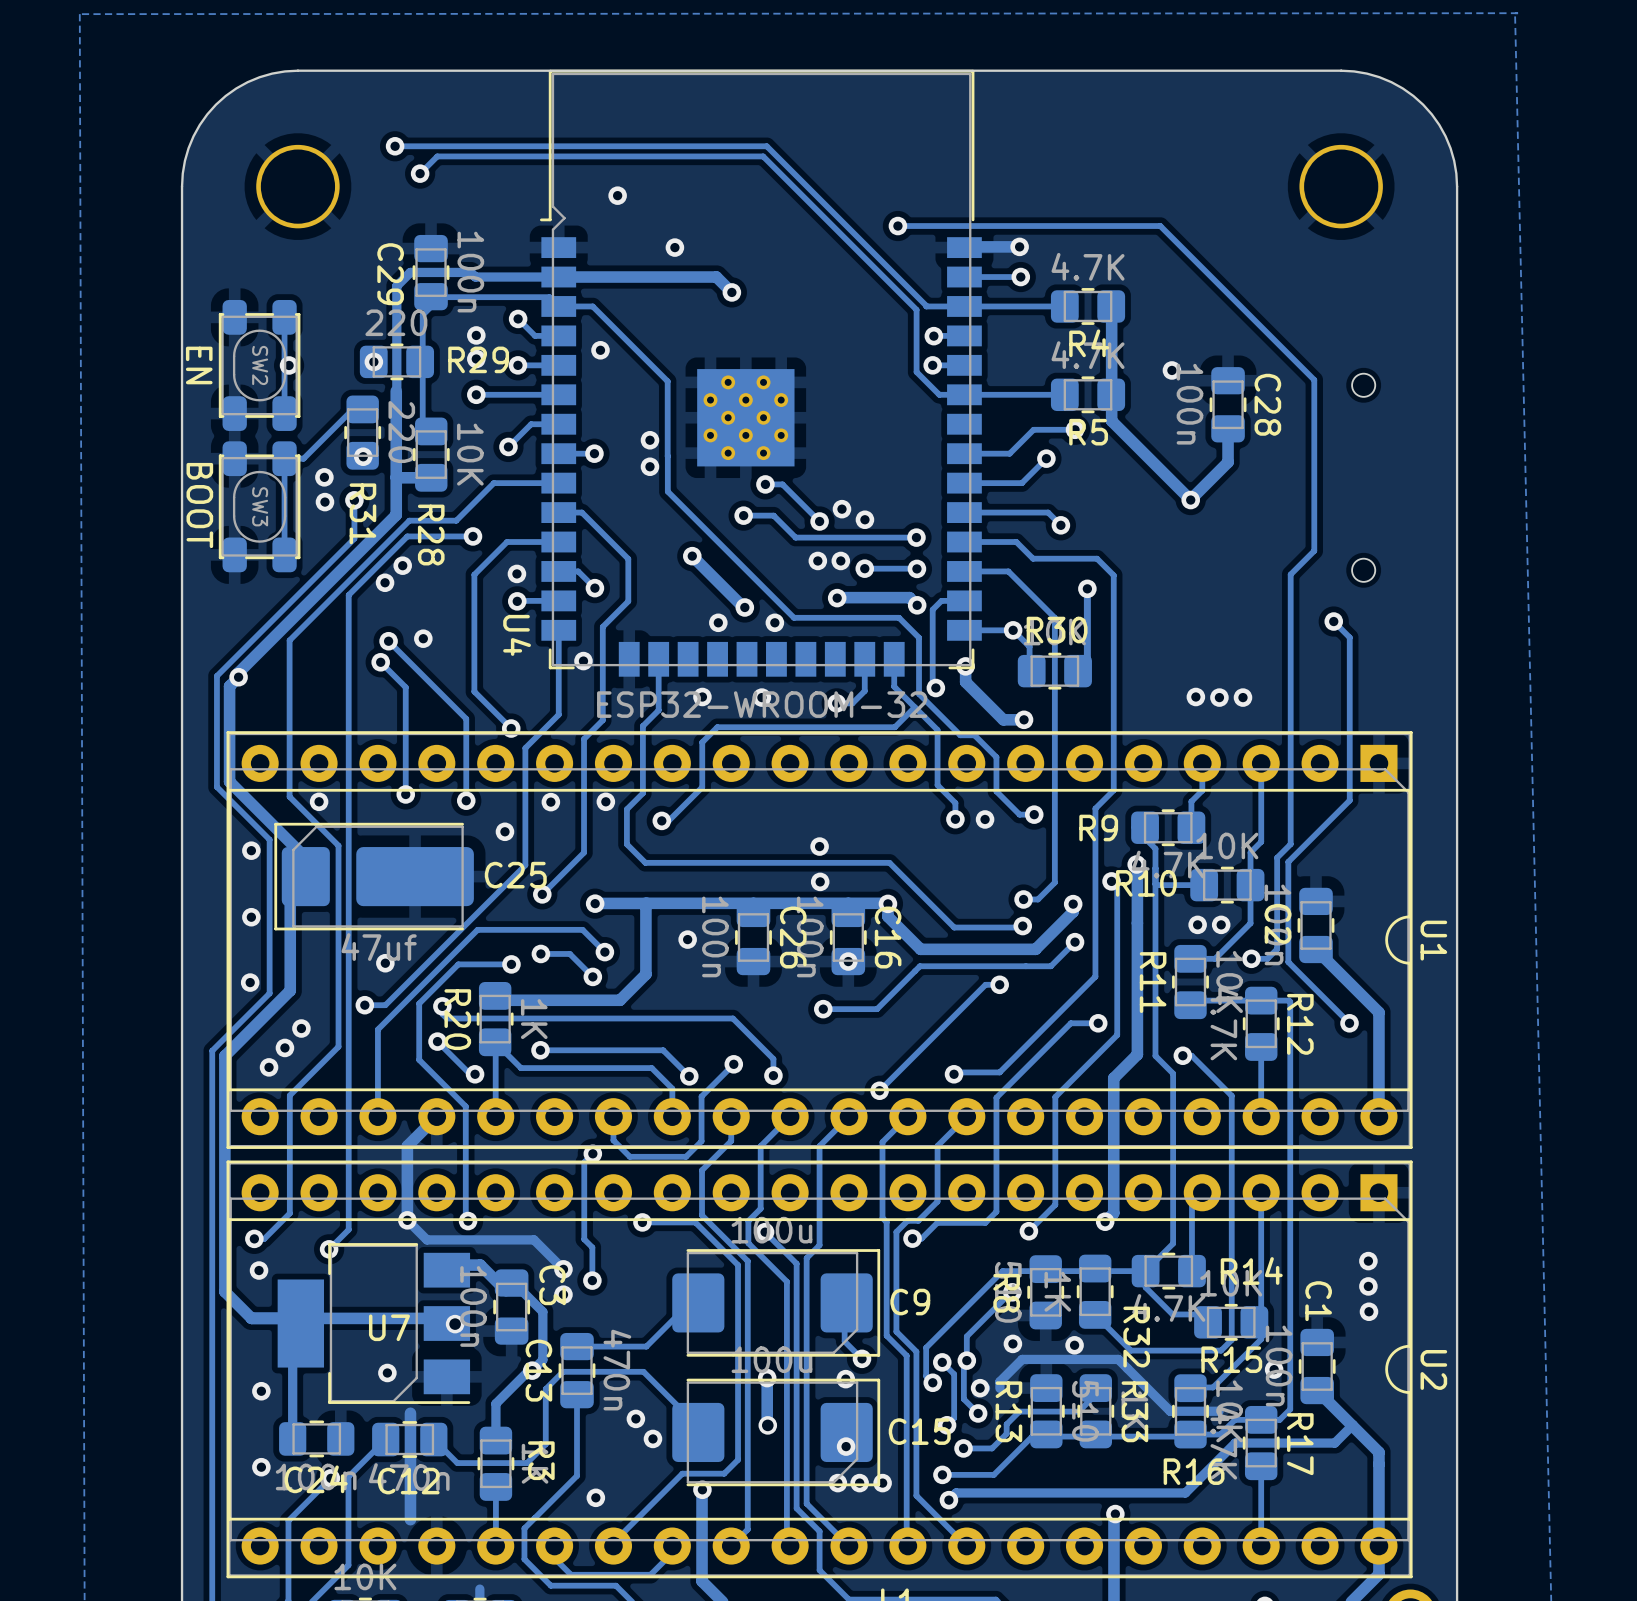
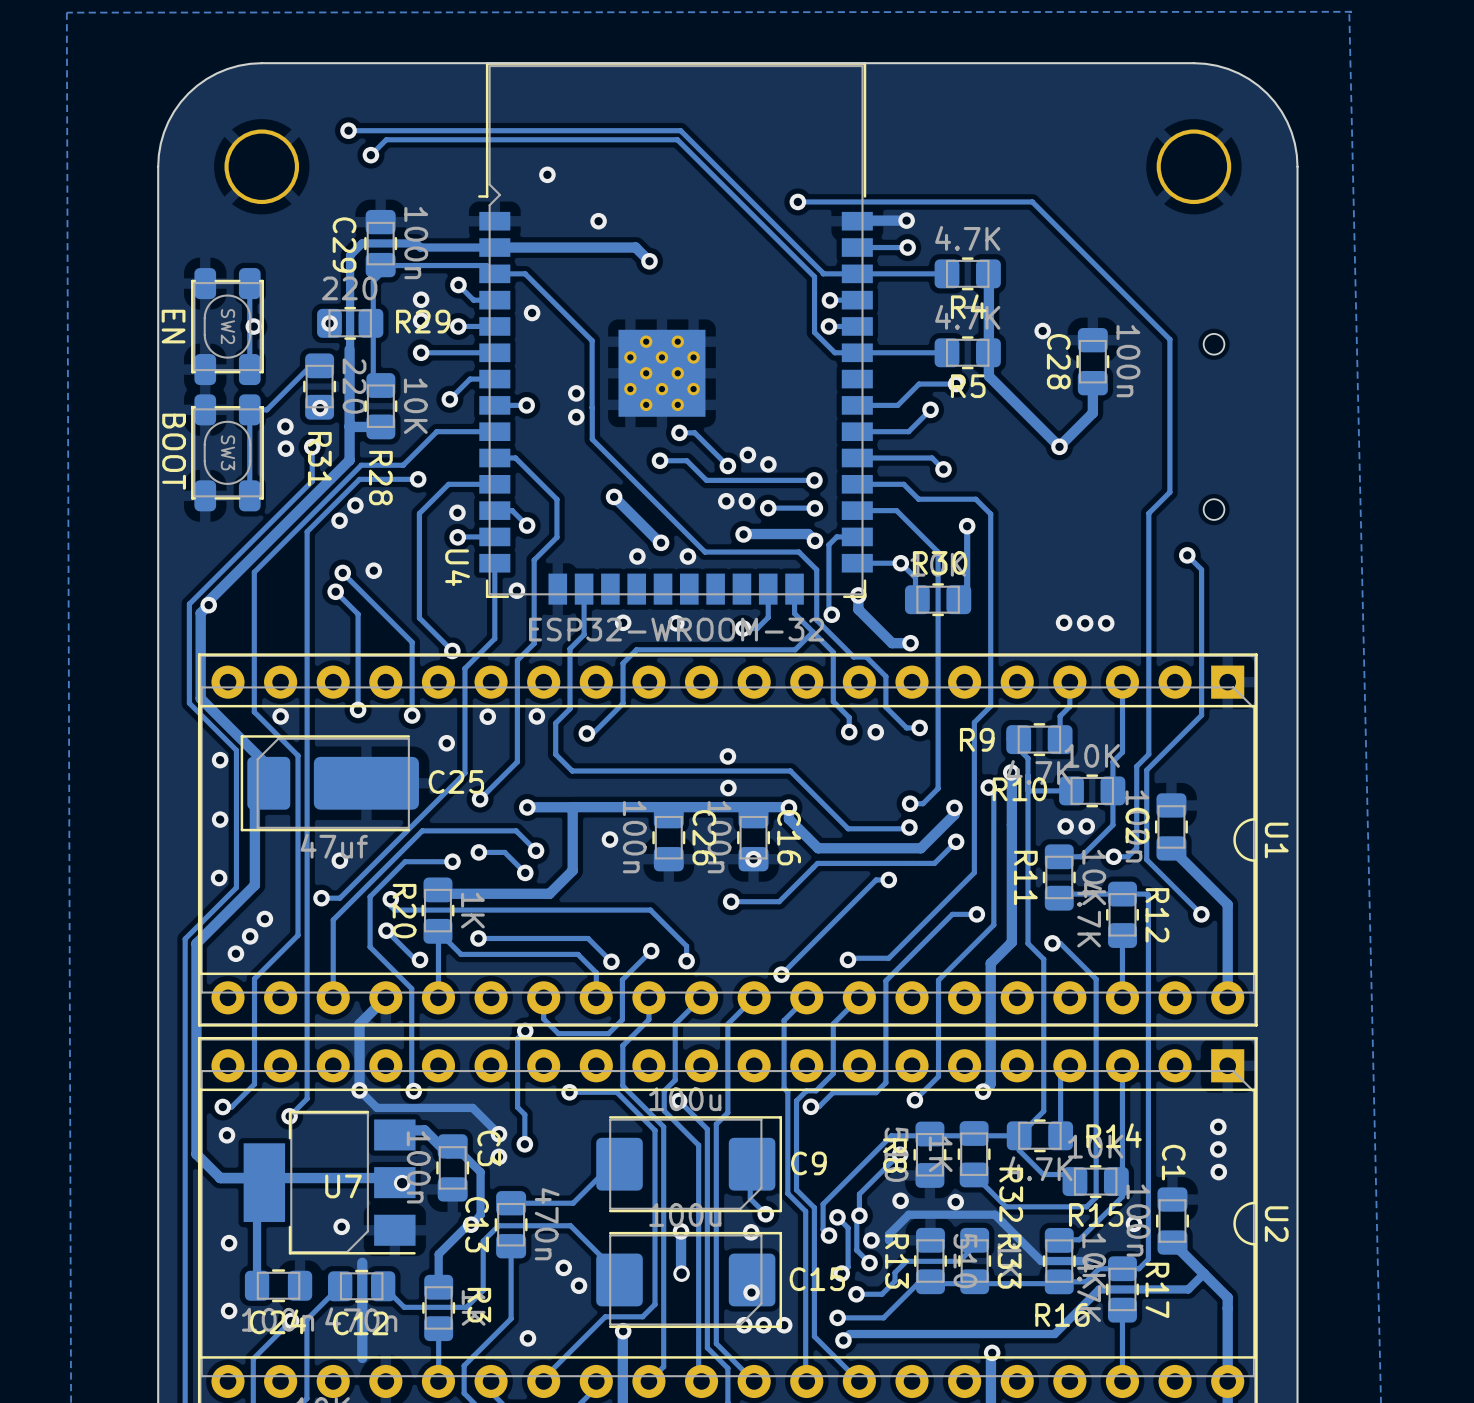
C28 value position: 100n (1189, 404) -> 100n (1128, 361)
C28 name position: C28 (1267, 404) -> C28 (1058, 361)

